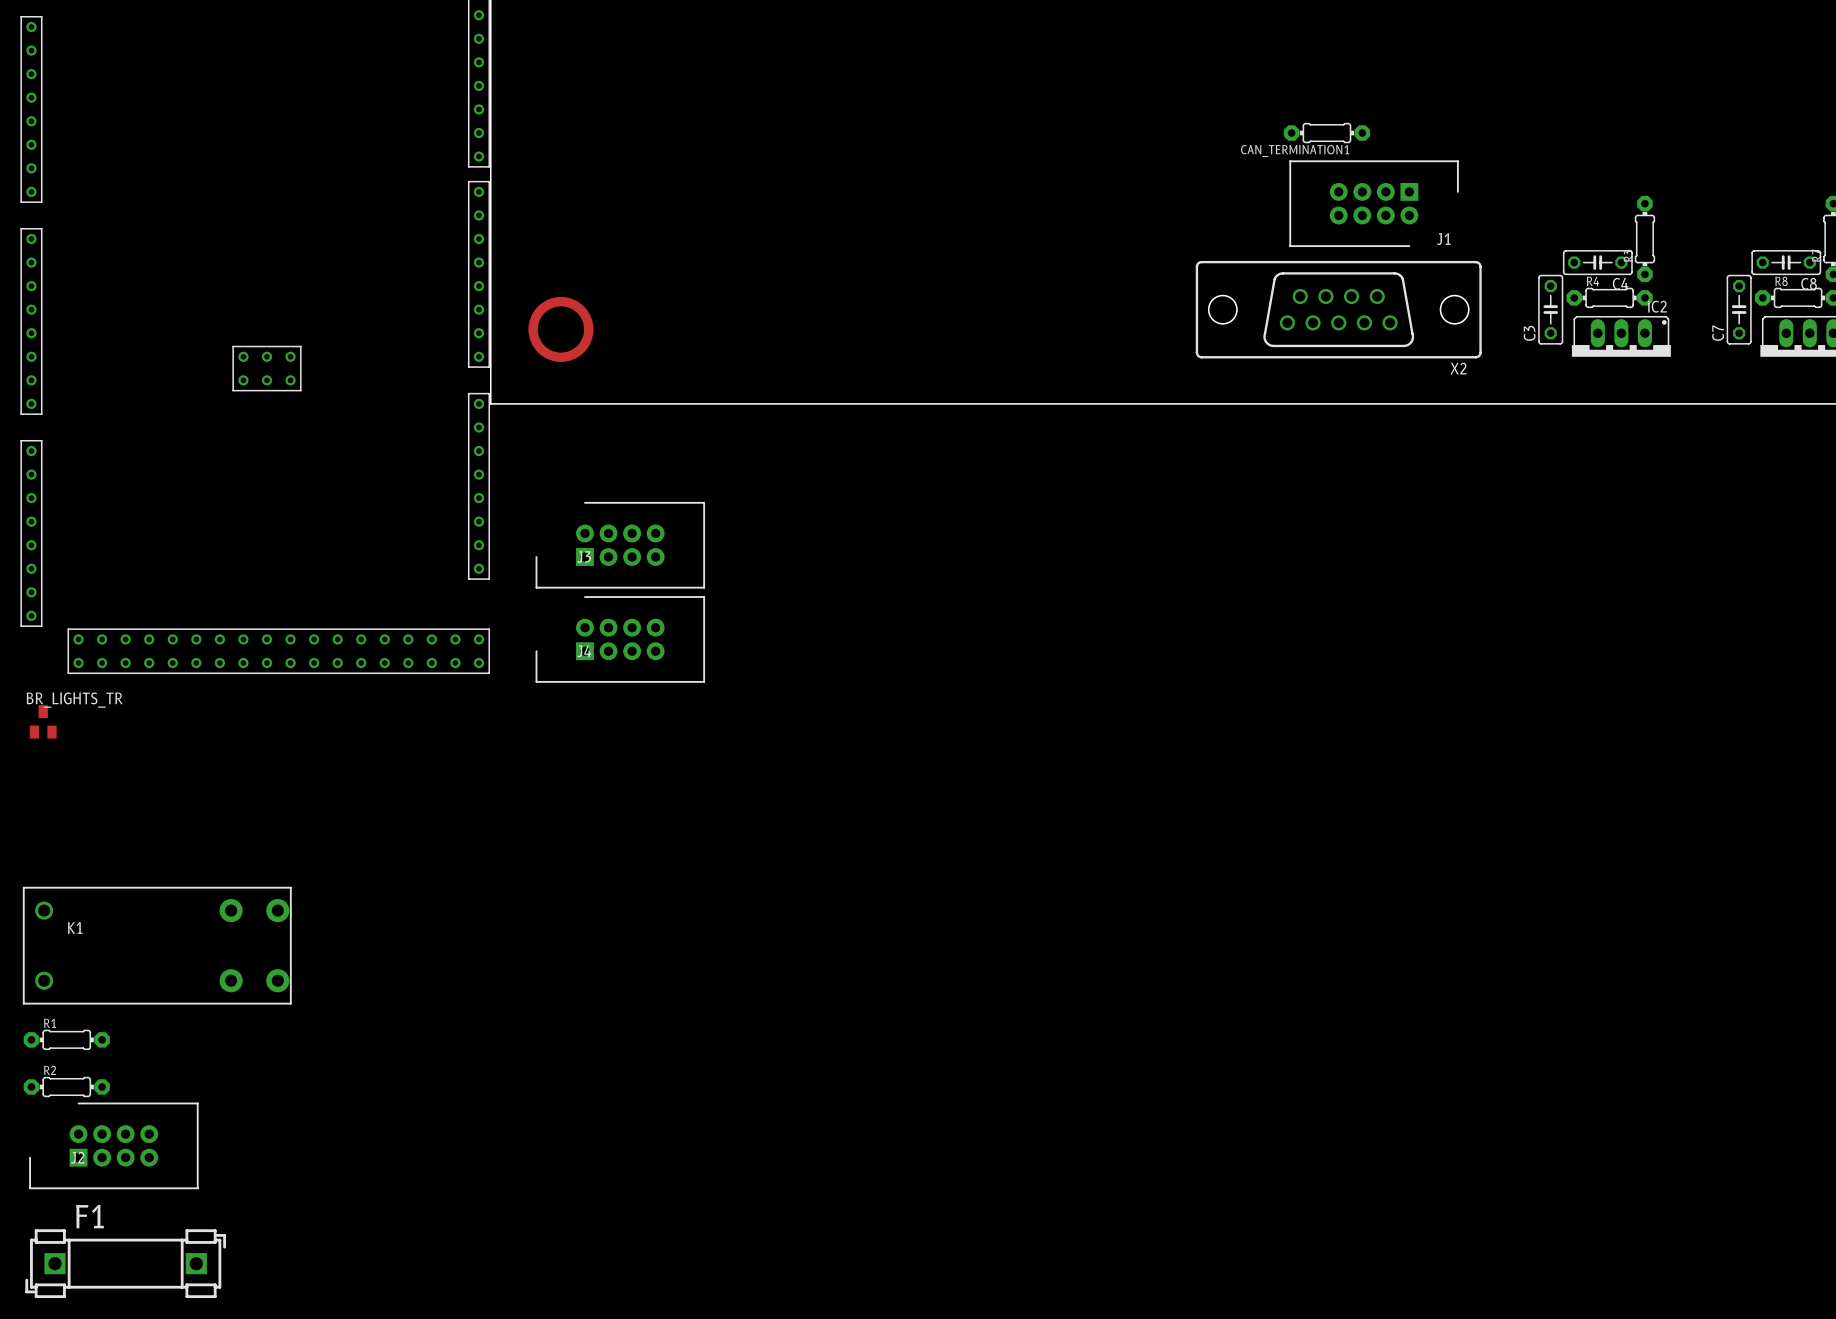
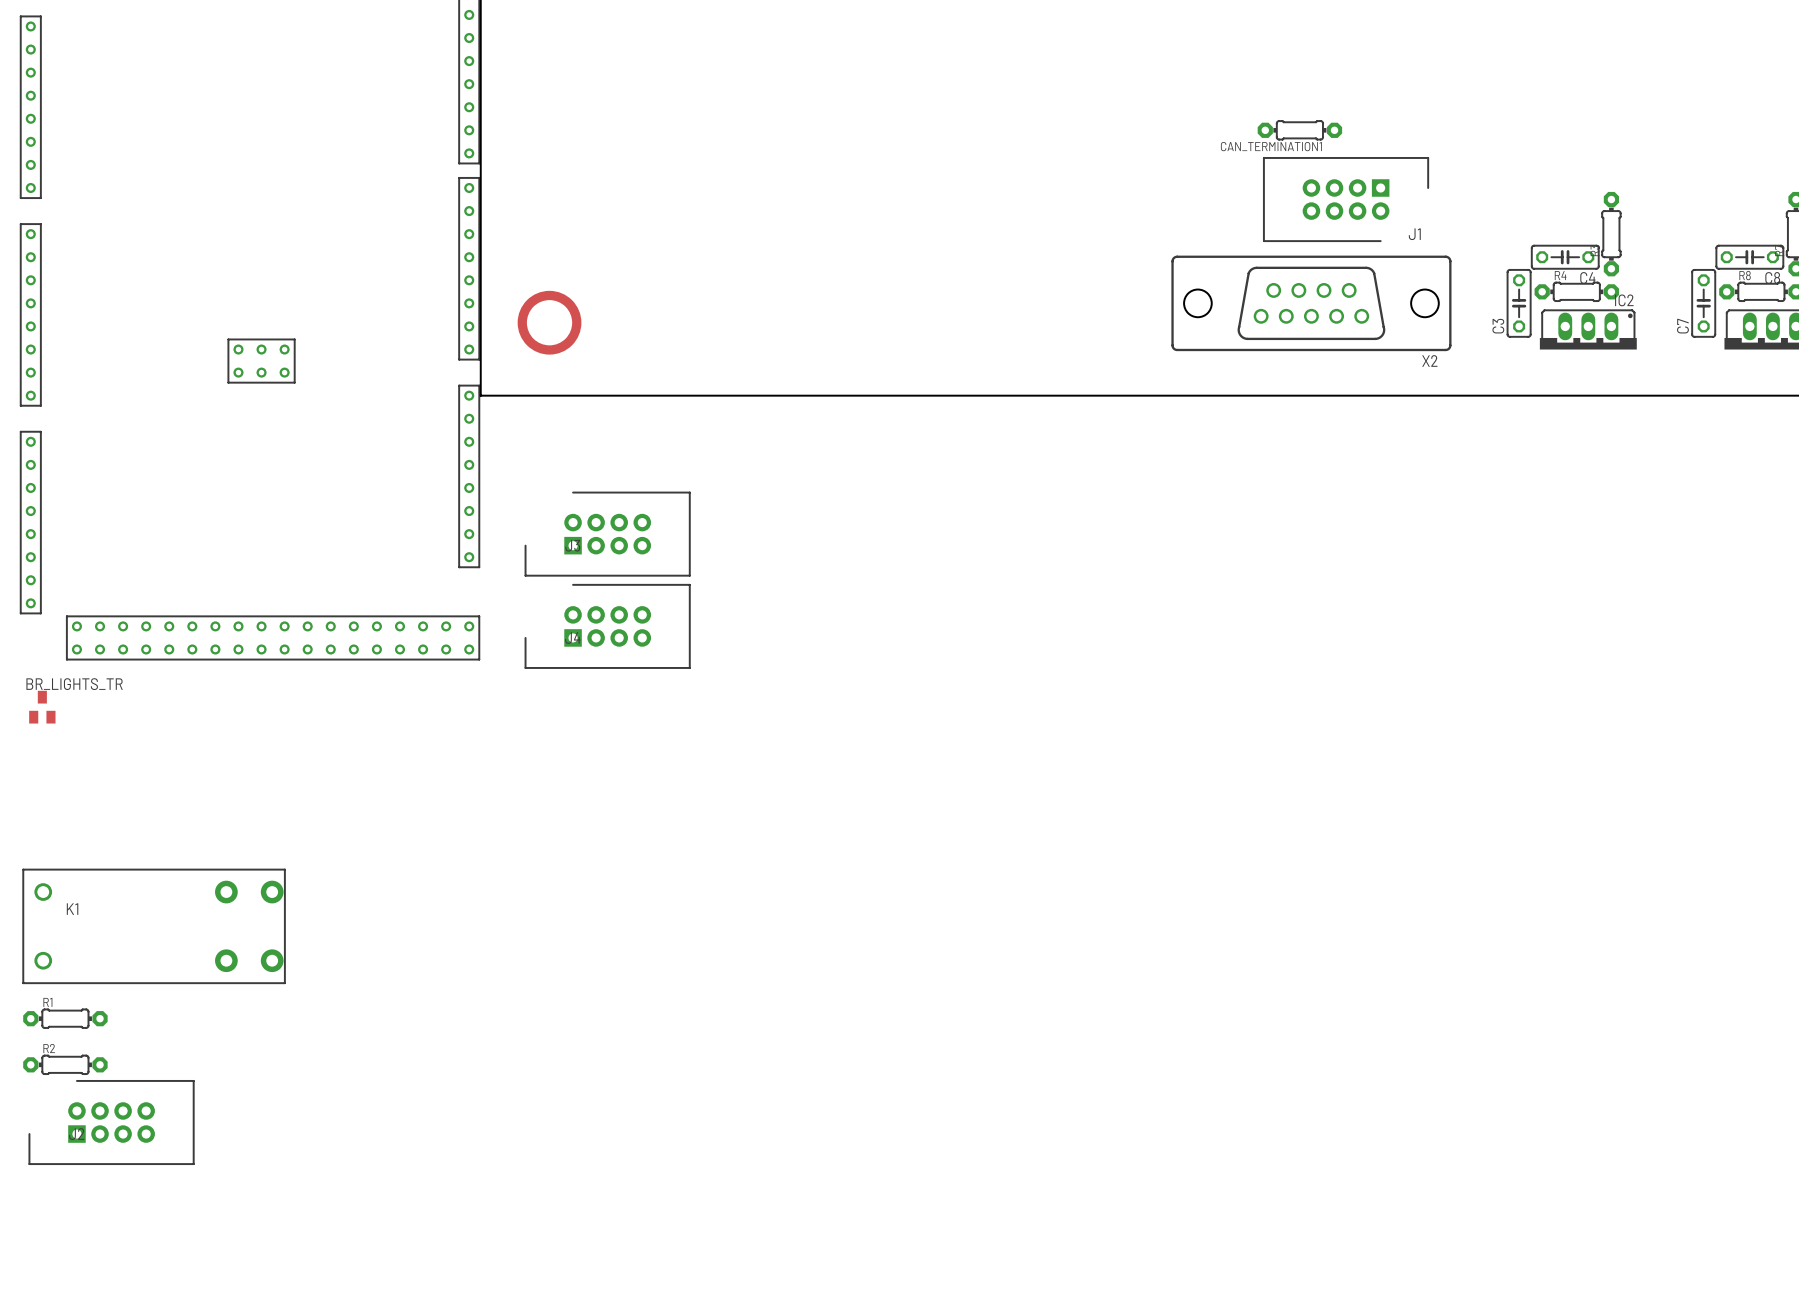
F1: (125, 1263) -> none

